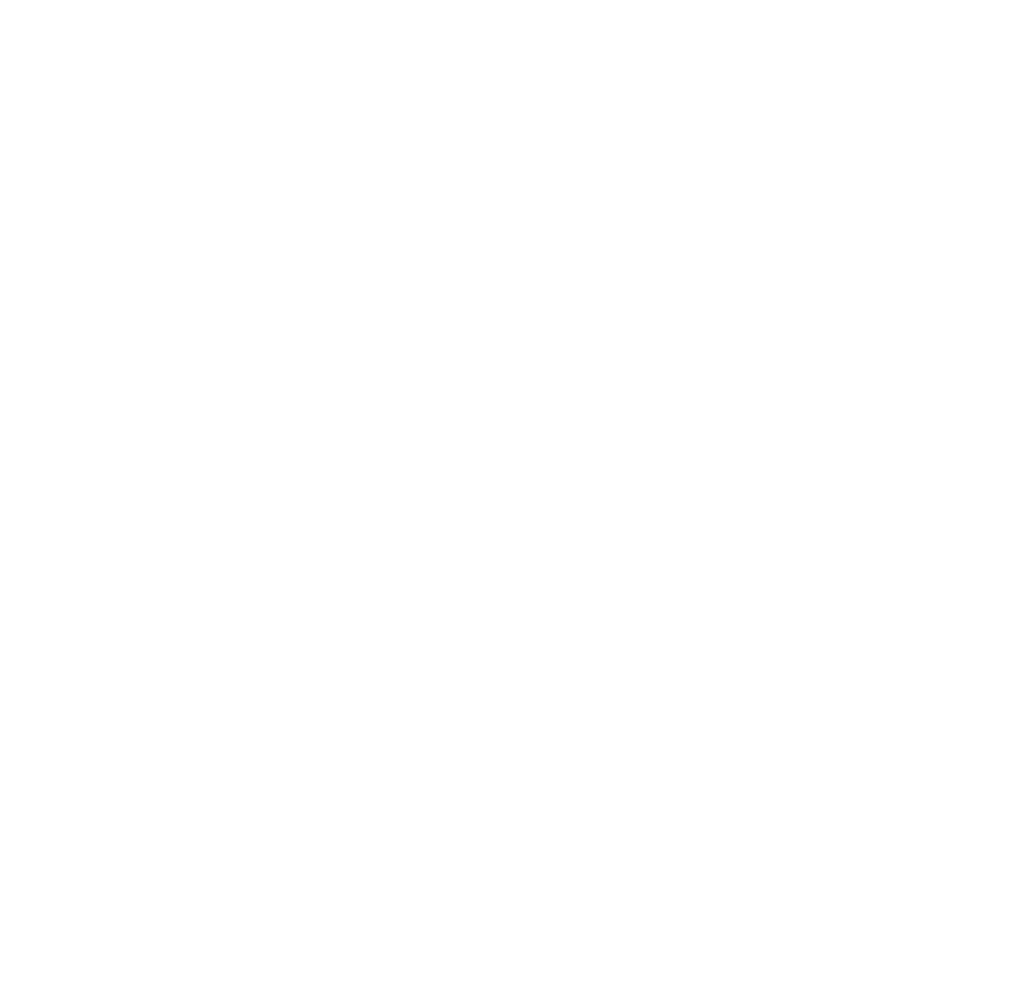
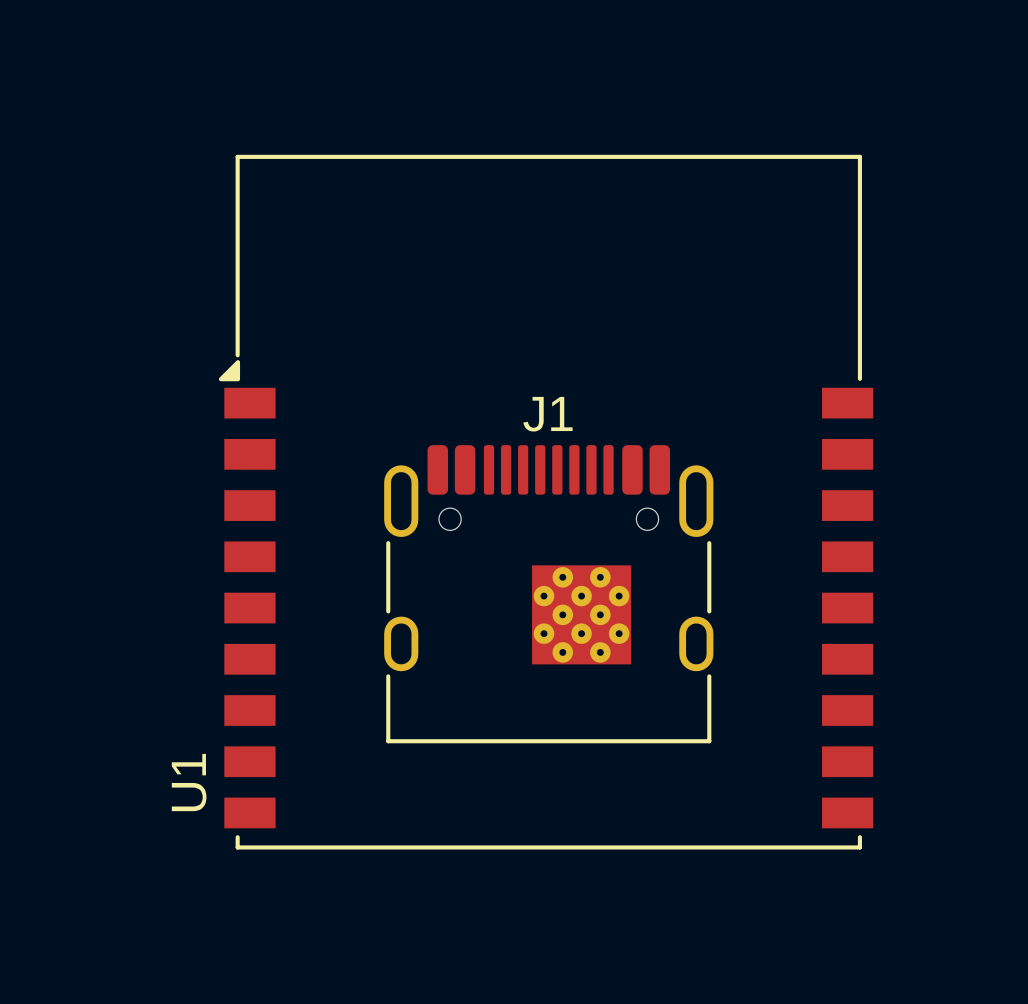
U1: none -> (546, 502)
J1: none -> (548, 594)

